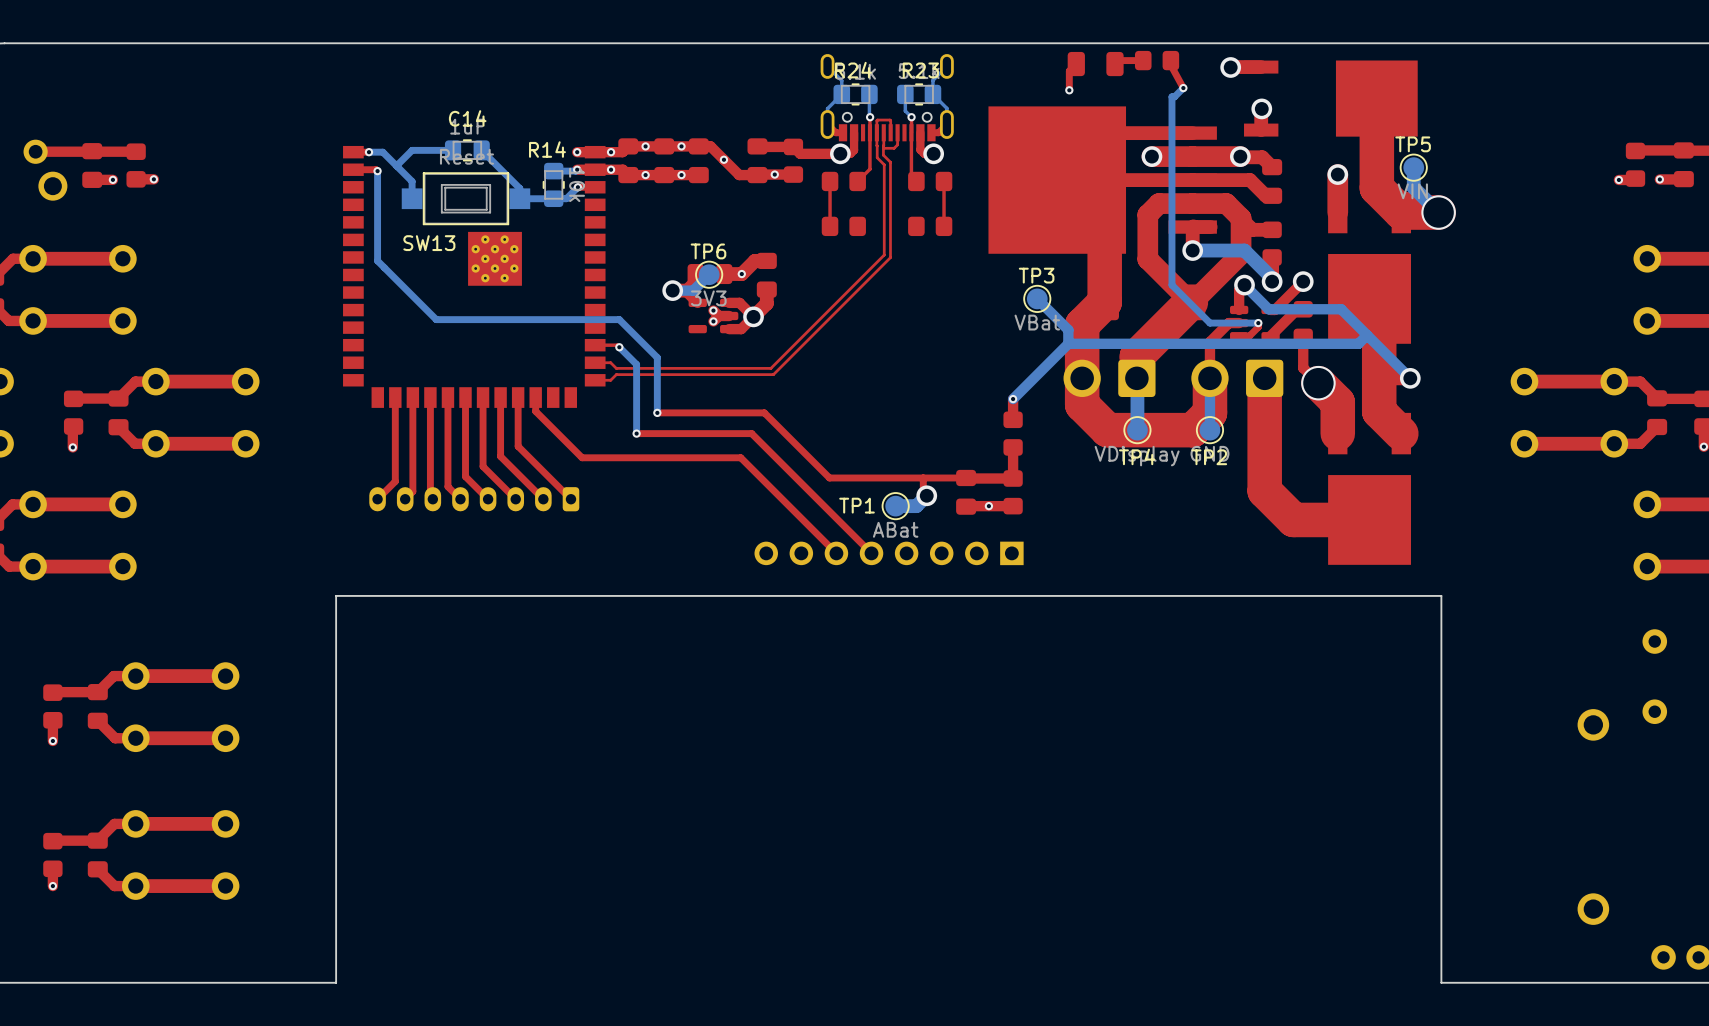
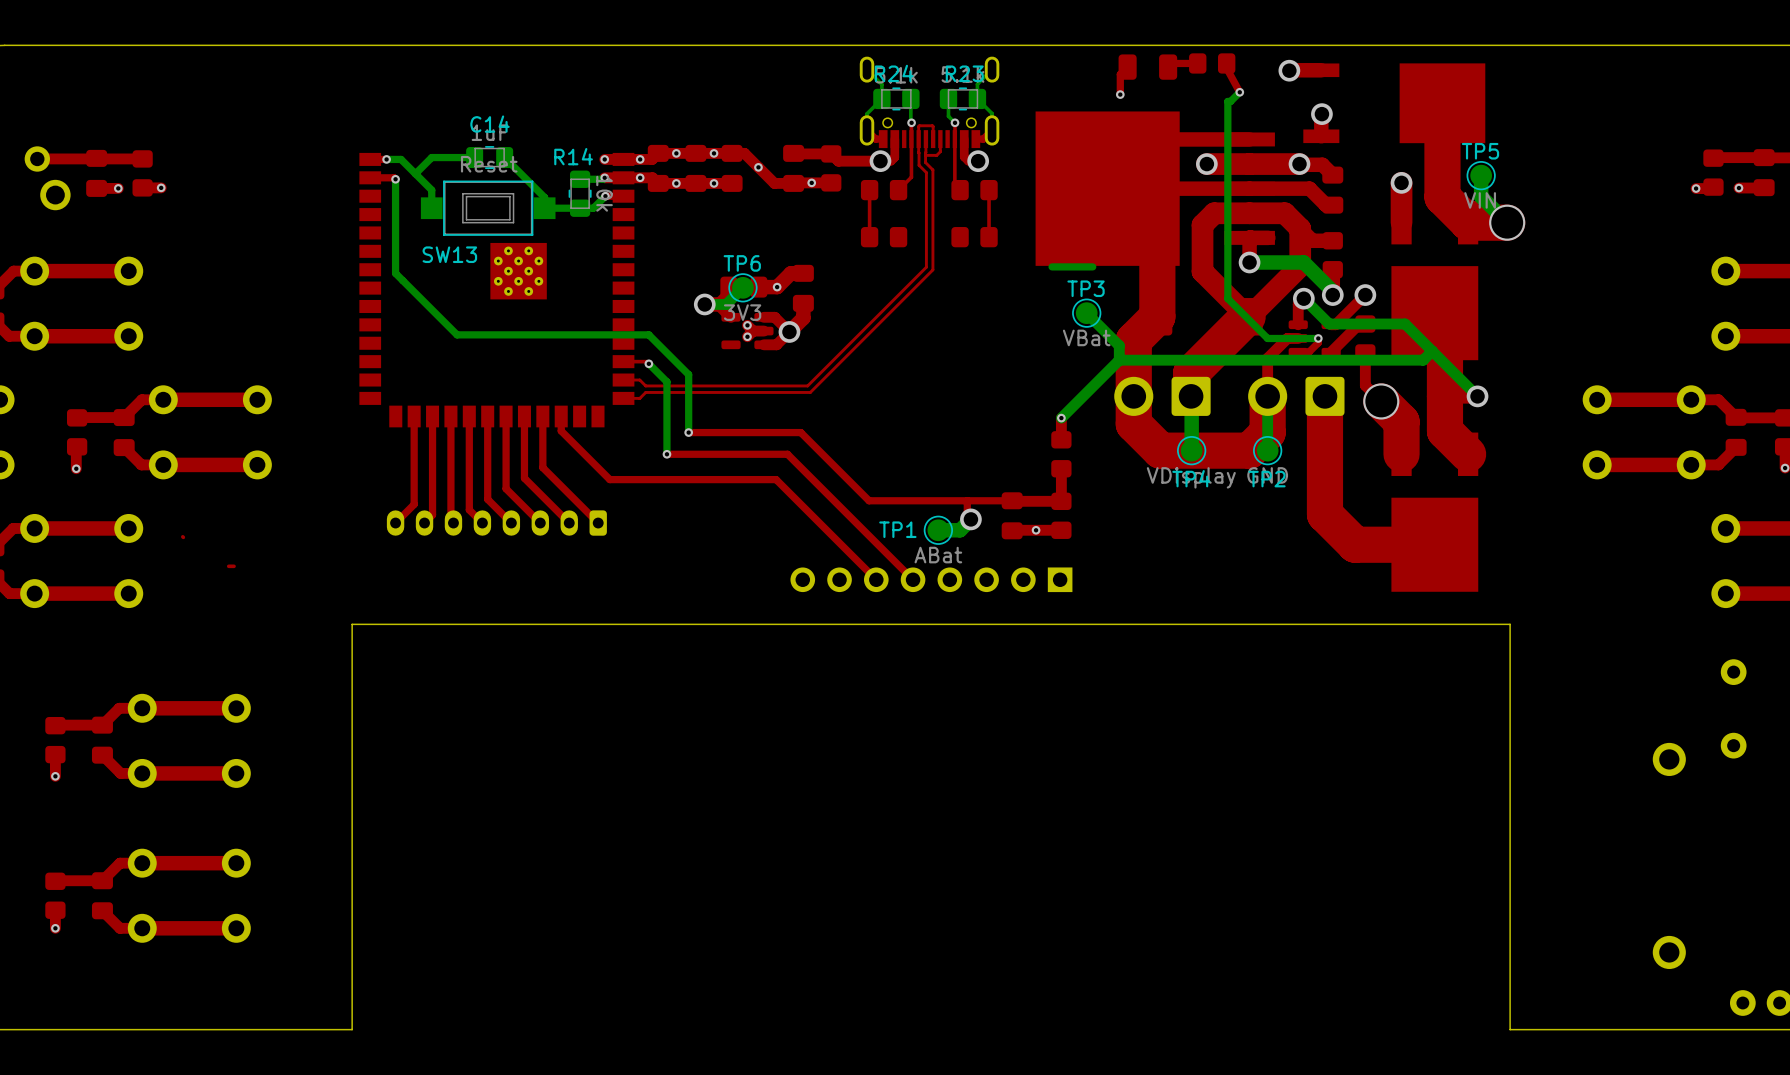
bottom track: none -> (1092, 266) (1052, 266)
top track: none -> (182, 536) (183, 537)
top track: none -> (234, 566) (228, 566)

